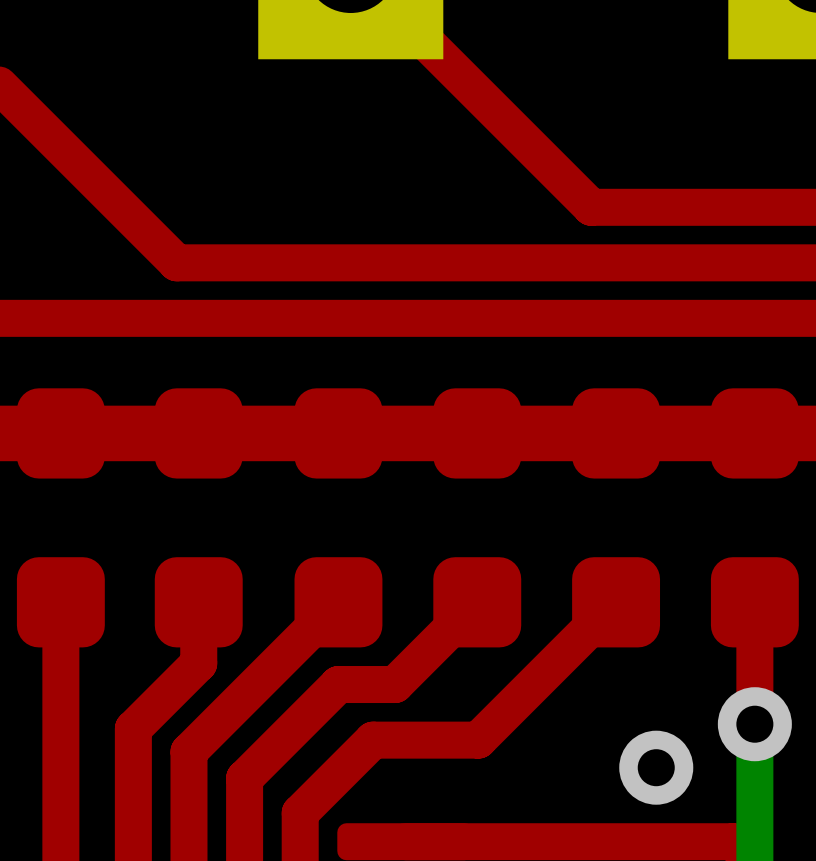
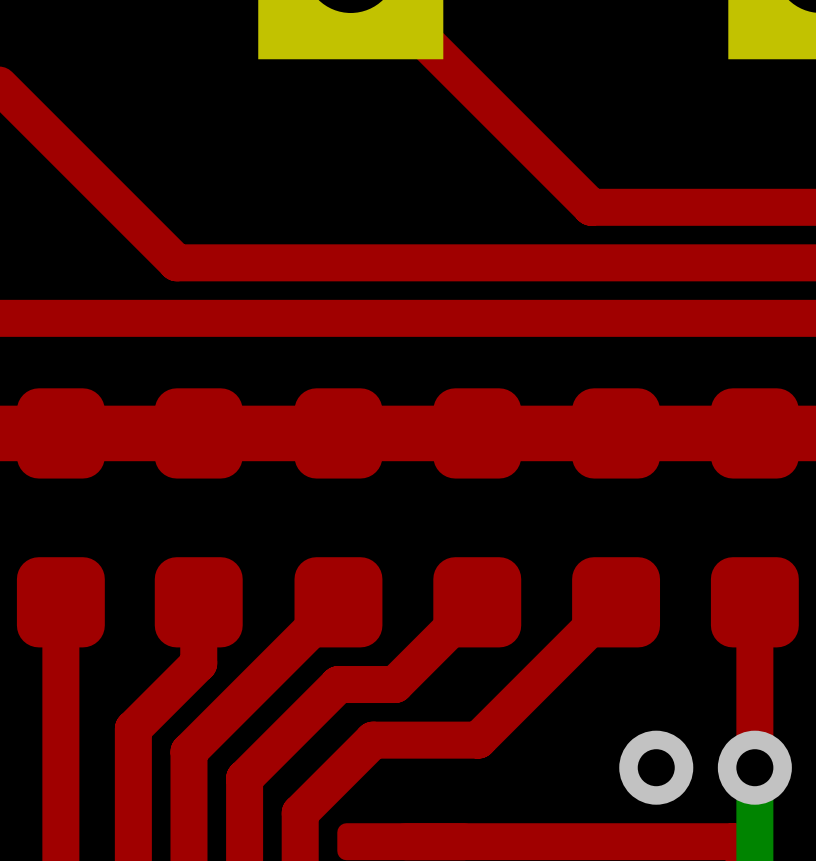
via position: (754, 724) -> (754, 767)

